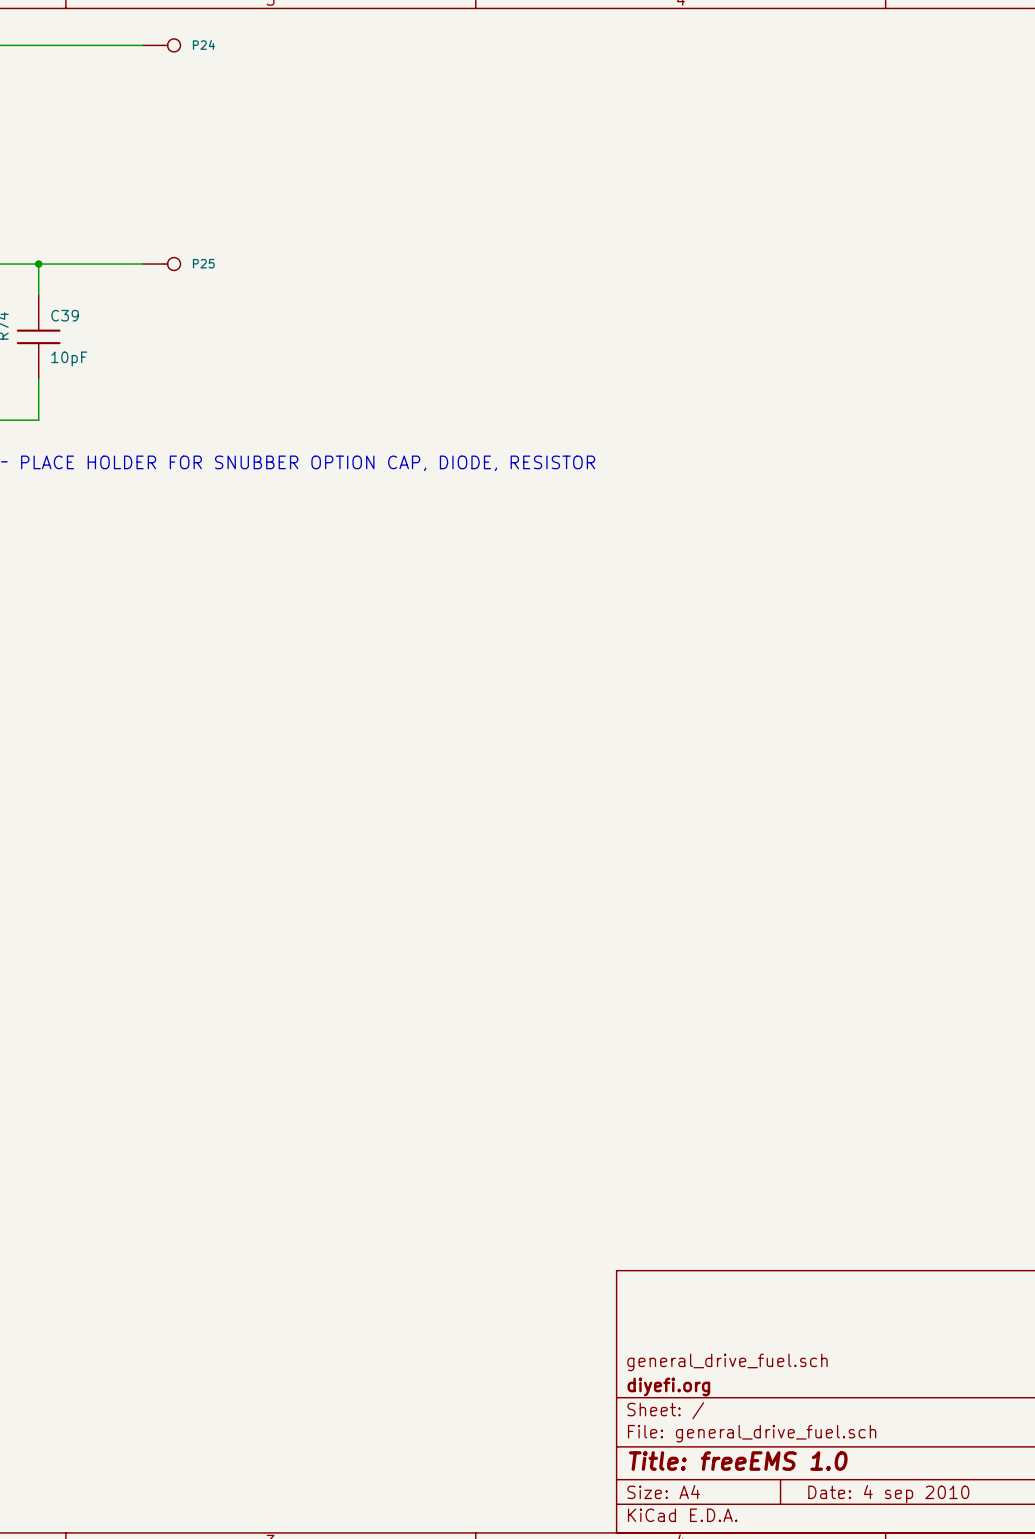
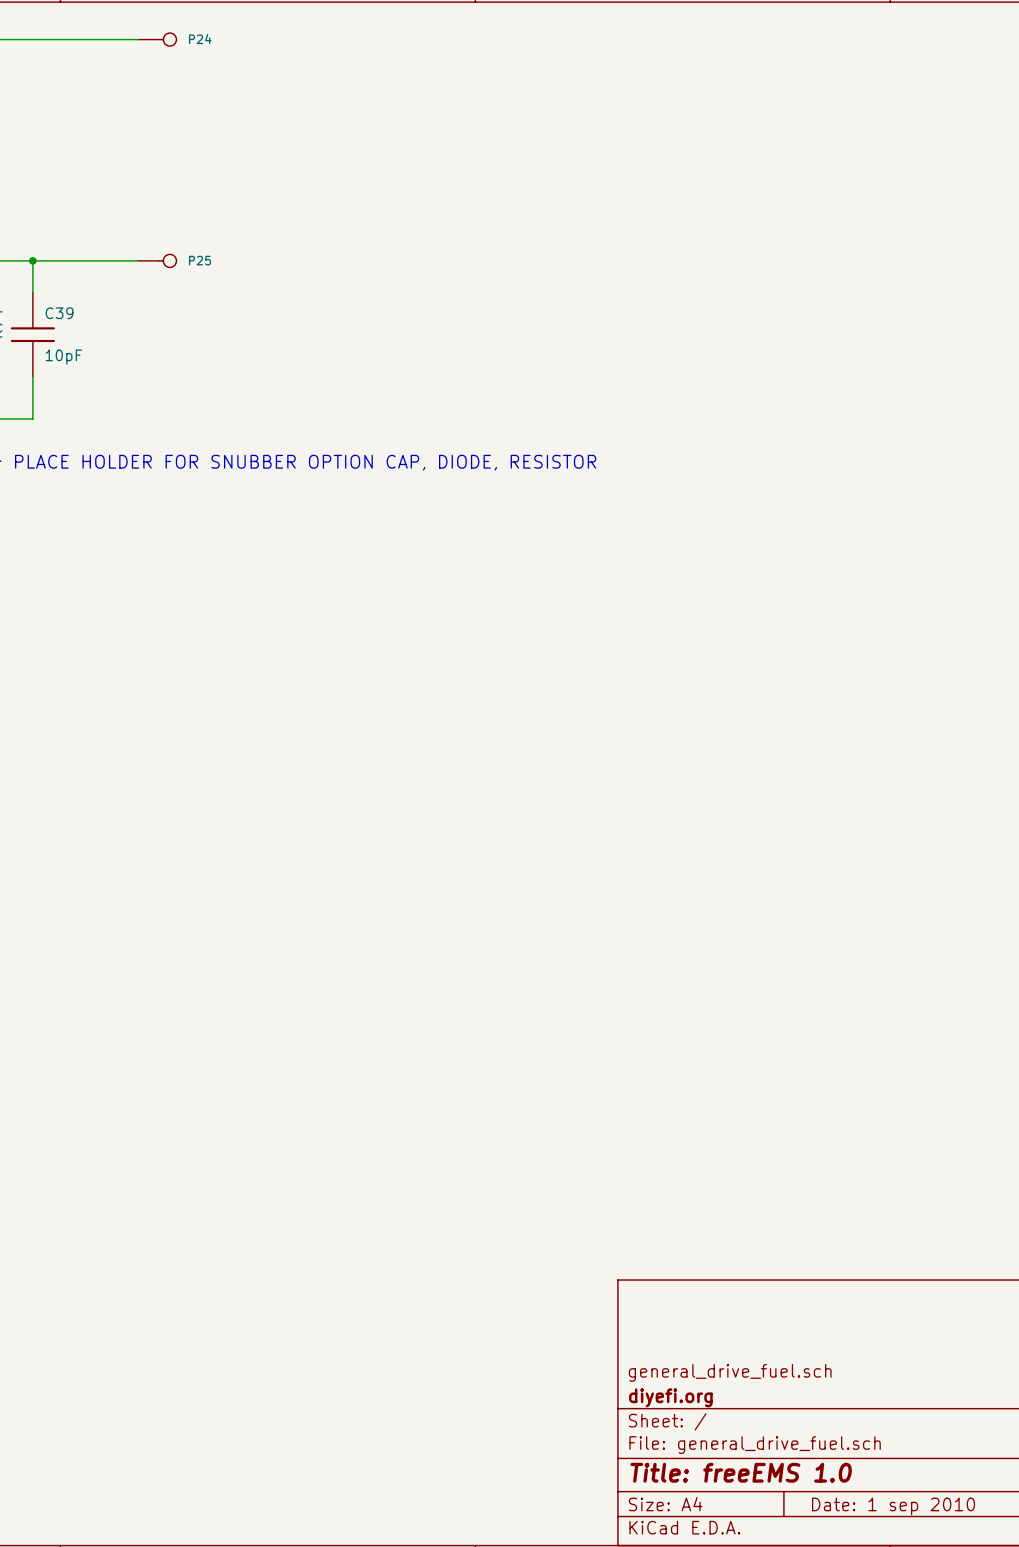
title block: Date: 4 sep 2010 (888, 1494) -> Date: 1 sep 2010 (893, 1506)

